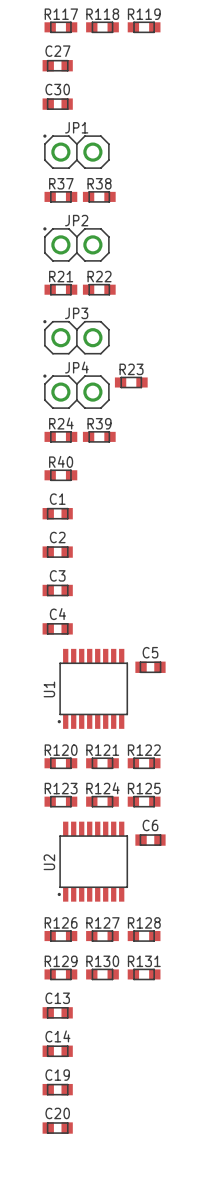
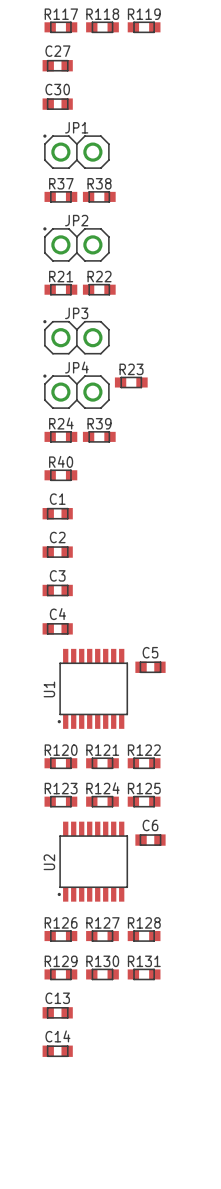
C19: (57, 1089) -> none
C20: (57, 1128) -> none

